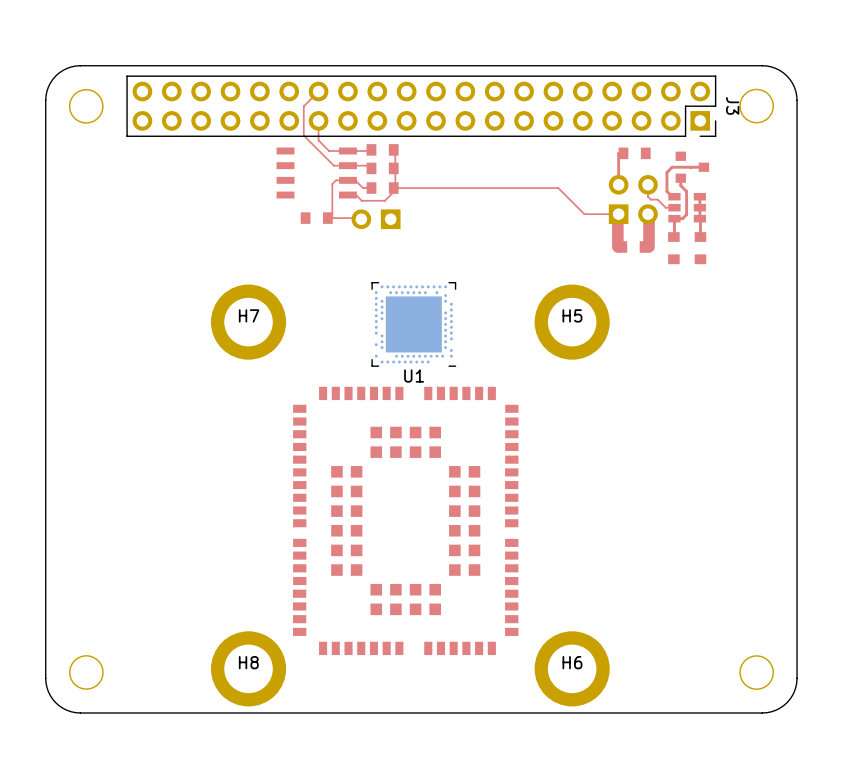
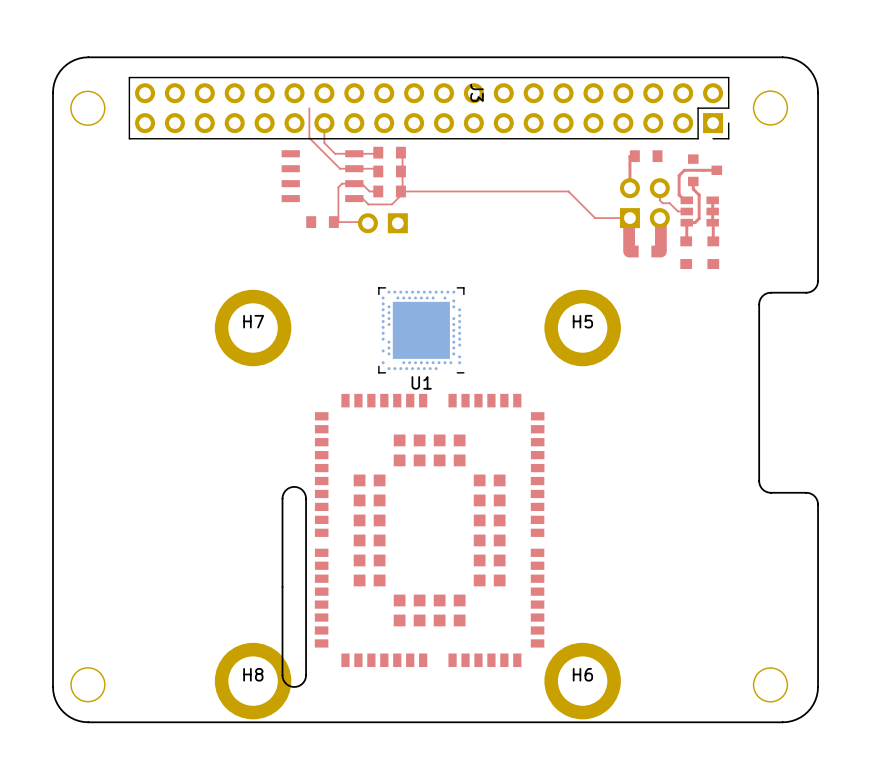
board edge: (762, 65) (80, 65) (67, 68) (55, 75) (48, 87) (45, 100) (45, 678) (48, 691) (55, 702) (67, 710) (80, 713) (762, 713) (775, 710) (786, 702) (794, 691) (797, 678) (797, 100) (794, 87) (786, 75) (775, 68) (762, 65) -> (782, 57) (796, 59) (807, 67) (815, 79) (817, 88) (818, 280) (815, 288) (810, 291) (769, 292) (762, 296) (759, 301) (759, 481) (761, 488) (766, 491) (807, 492) (814, 496) (817, 501) (818, 686) (815, 700) (807, 711) (796, 719) (782, 722) (88, 722) (74, 719) (63, 711) (55, 700) (52, 686) (52, 92) (55, 79) (63, 67) (74, 59) (88, 57) (782, 57)
top track: (319, 91) (303, 106) -> none
J3 name position: J3 (732, 105) -> J3 (477, 92)
board edge: none -> (306, 498) (305, 676) (301, 684) (292, 686) (285, 683) (282, 675) (282, 497) (285, 490) (294, 486) (302, 490) (306, 498)
part position: (405, 520) -> (429, 530)

